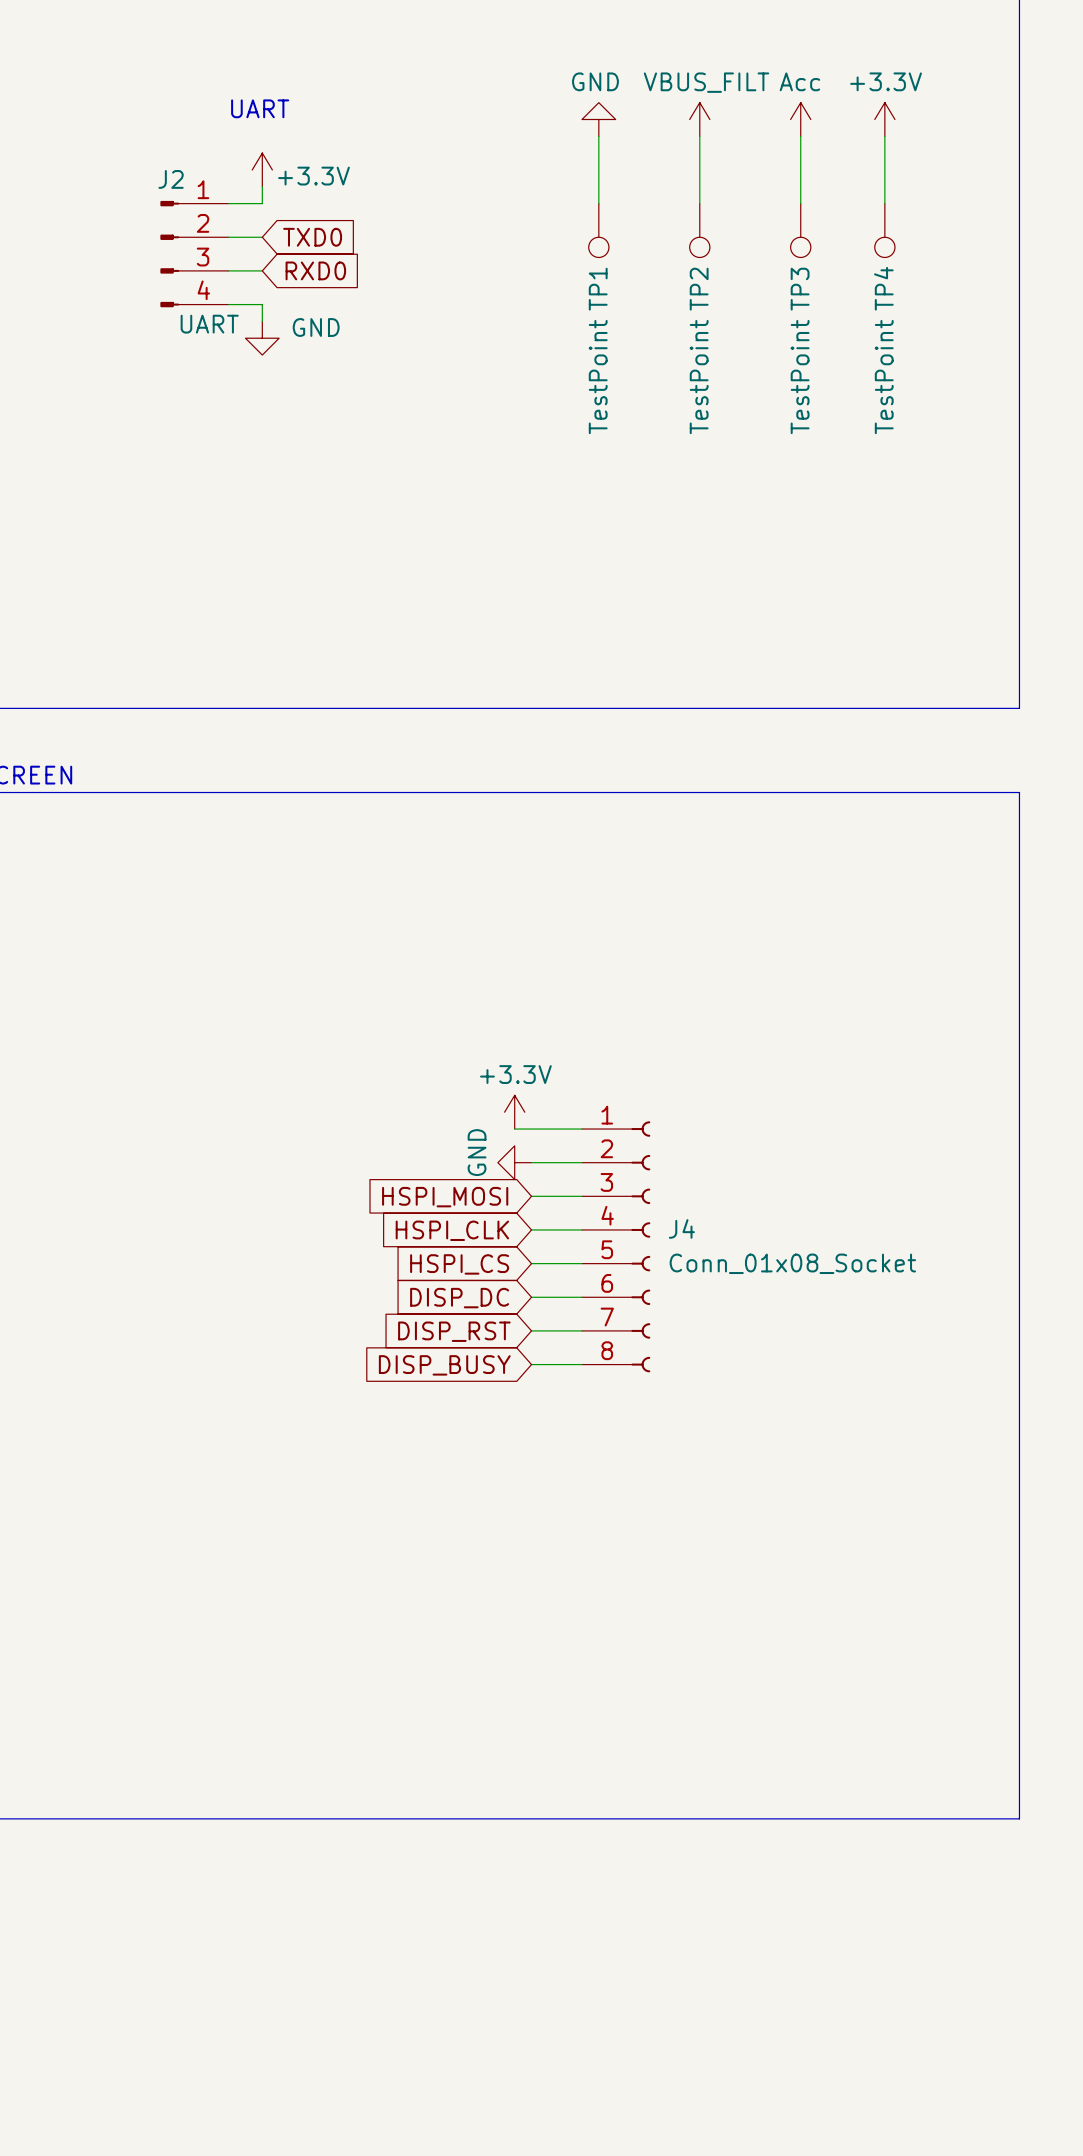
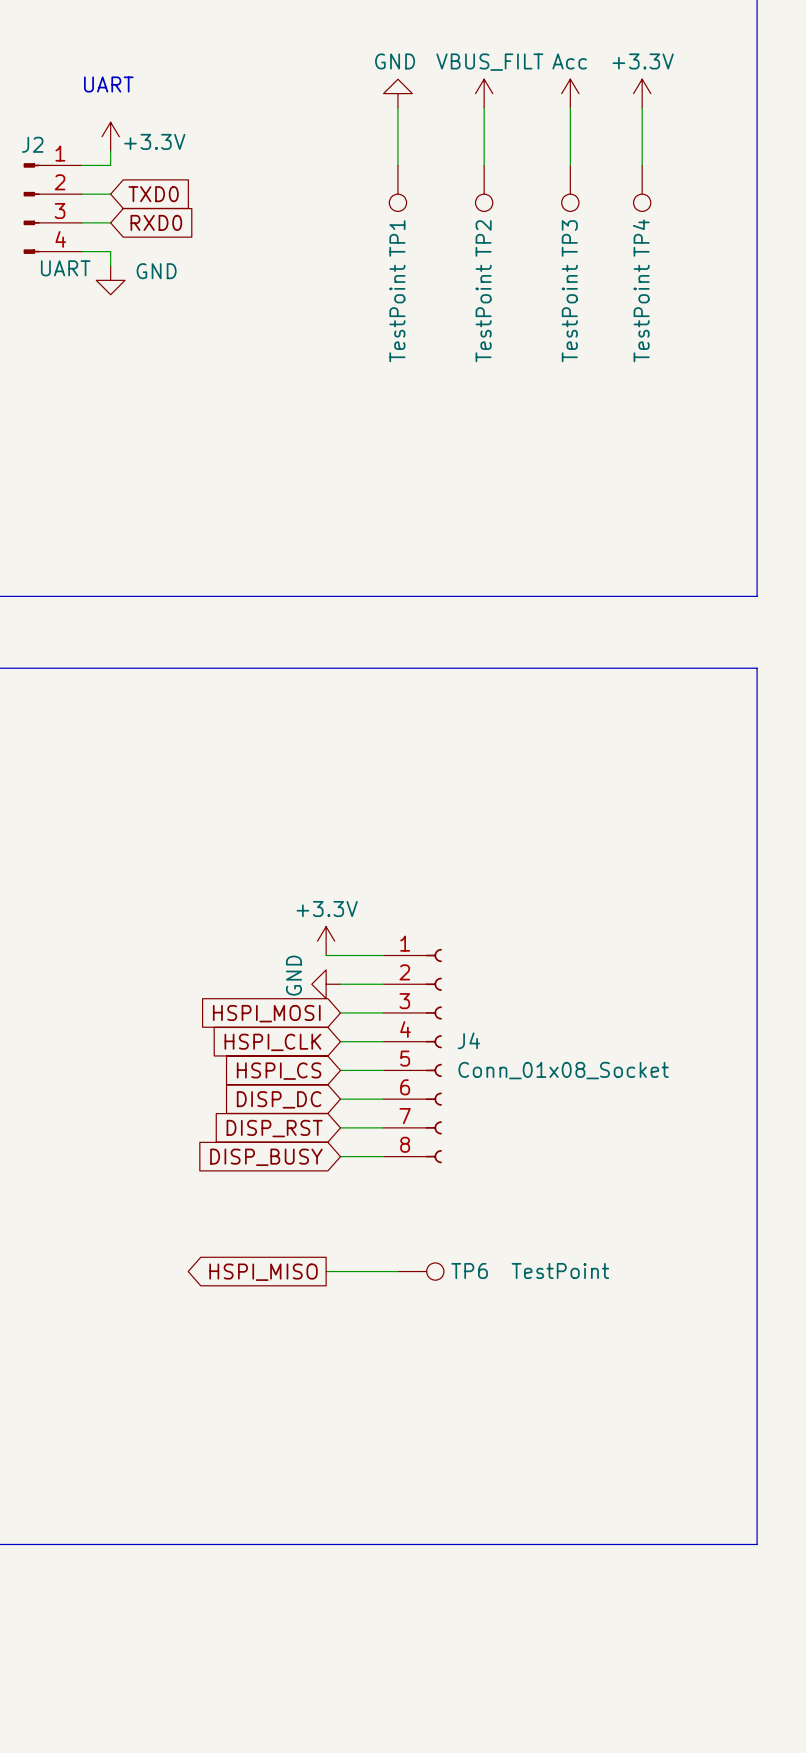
global label: none -> HSPI_MISO (263, 1272)
wire: none -> (326, 1271) (397, 1271)
TP6: none -> TestPoint (420, 1271)

